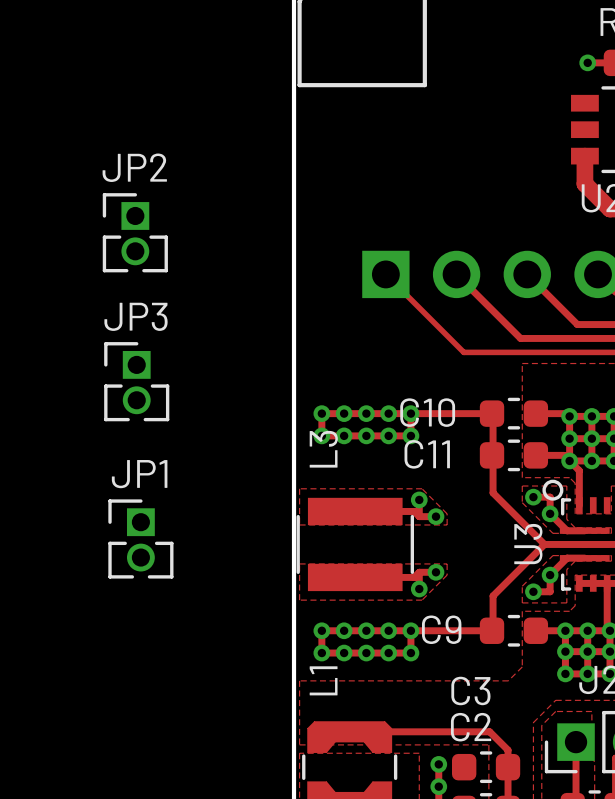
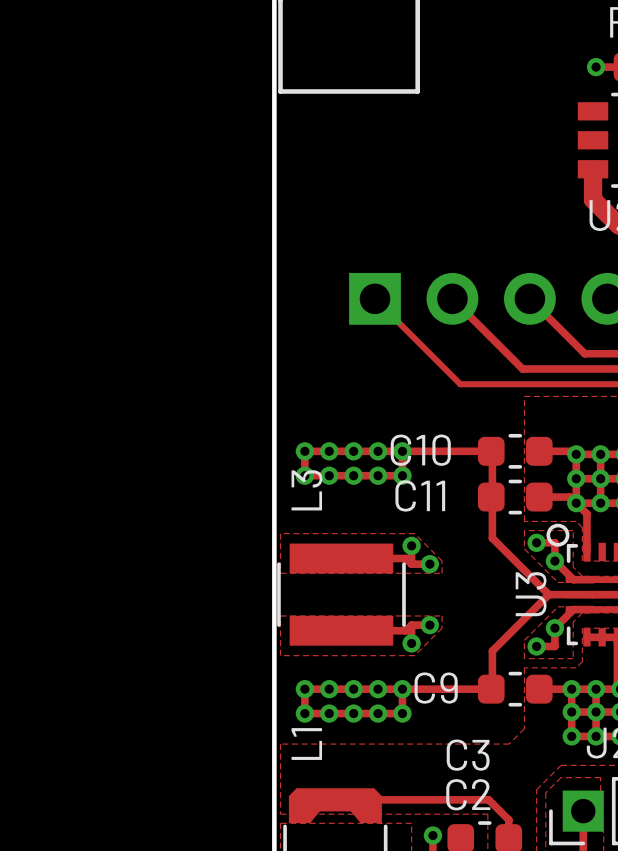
JP2: (135, 232) -> none
JP3: (136, 381) -> none
JP1: (140, 538) -> none

